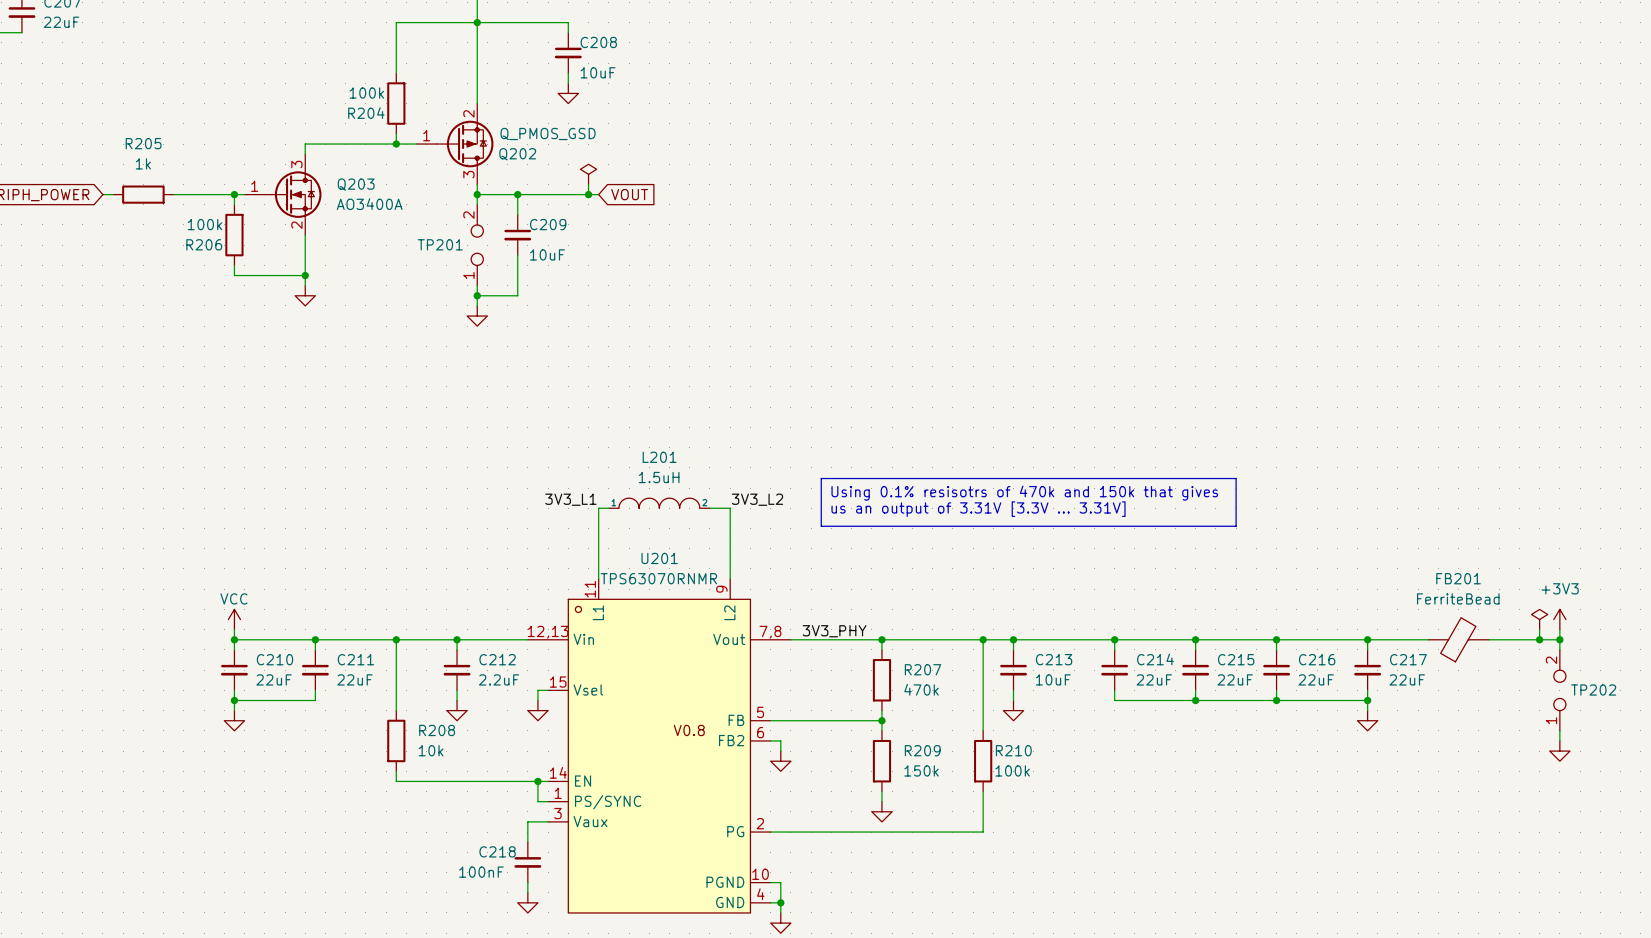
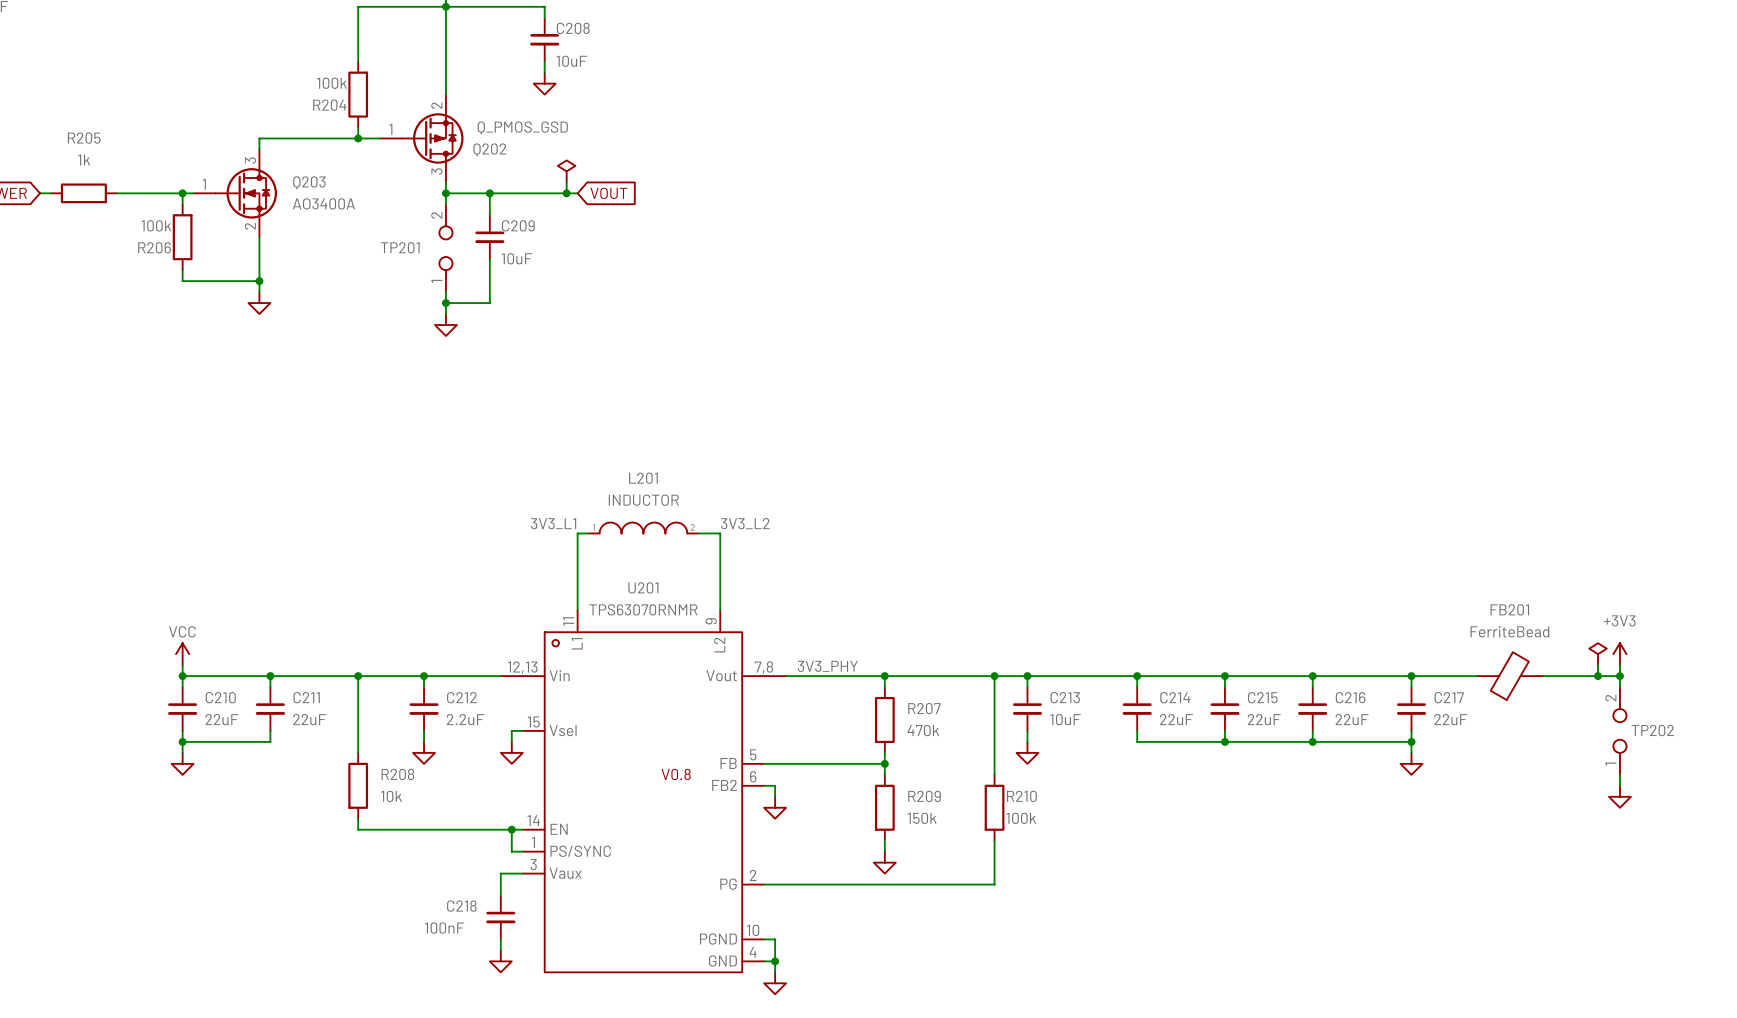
L201 value: 1.5uH (659, 477) -> INDUCTOR (643, 500)
line: (821, 478) (1236, 478) (1236, 526) (821, 526) (821, 478) -> none
text: Using 0.1% resisotrs of 470k and 150k that gives (1024, 493) -> none
text: us an output of 3.31V [3.3V ... 3.31V] (978, 509) -> none

